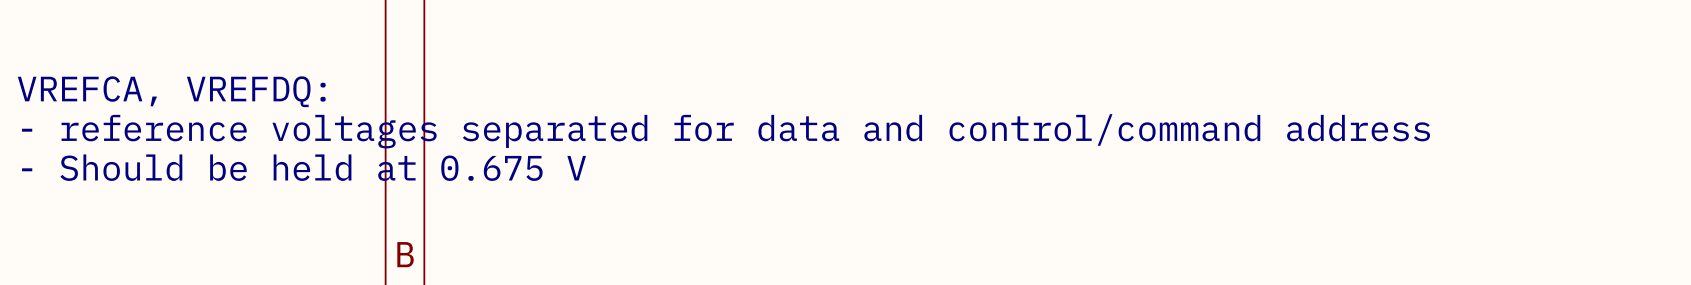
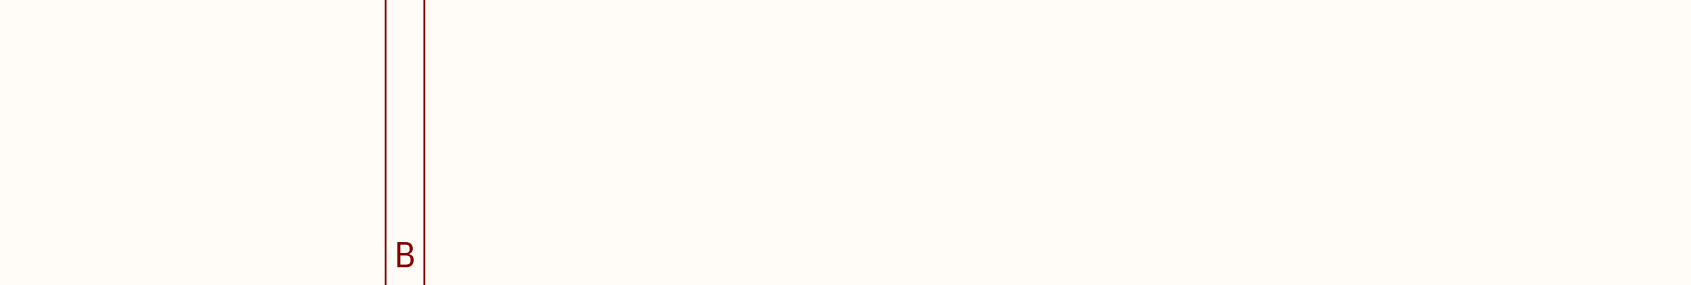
text: VREFCA, VREFDQ: (171, 91) -> none
text: - reference voltages separated for data and control/command address (726, 131) -> none
text: - Should be held at 0.675 V (304, 167) -> none

